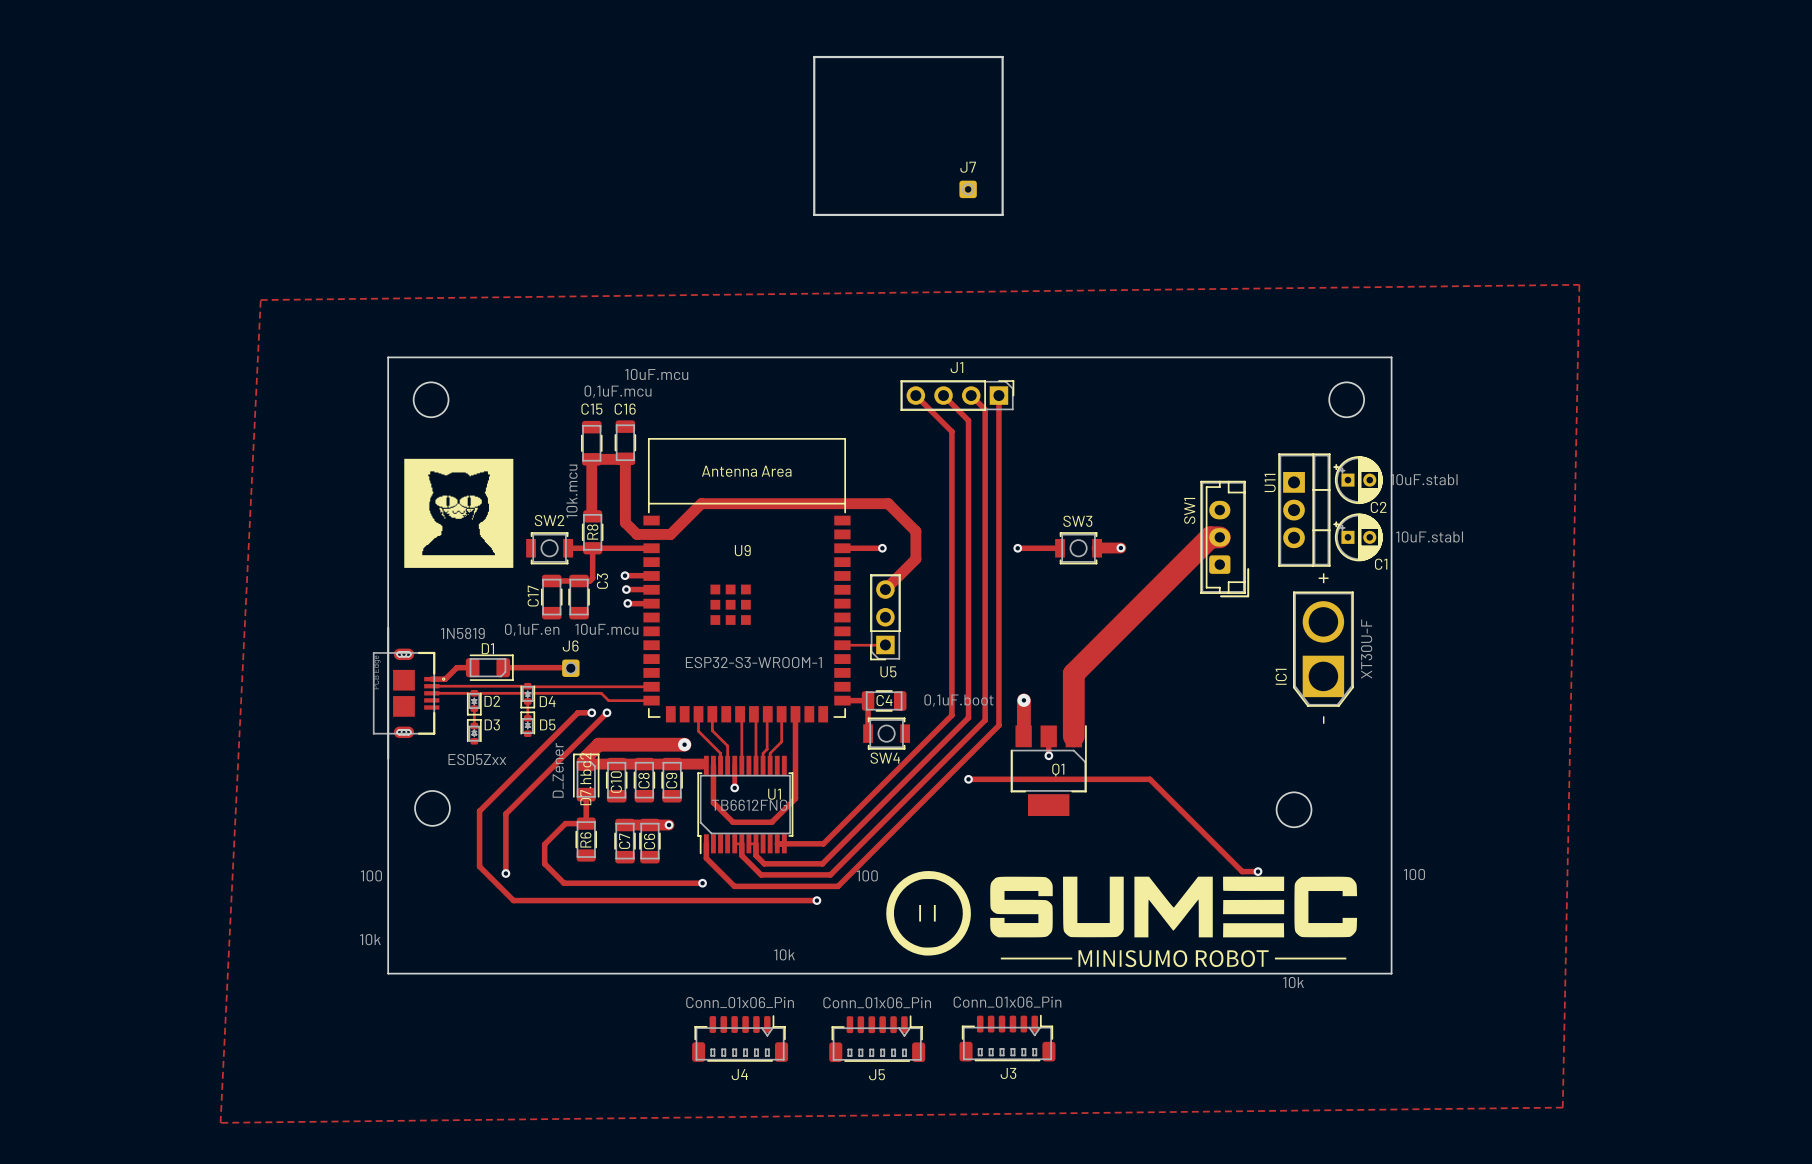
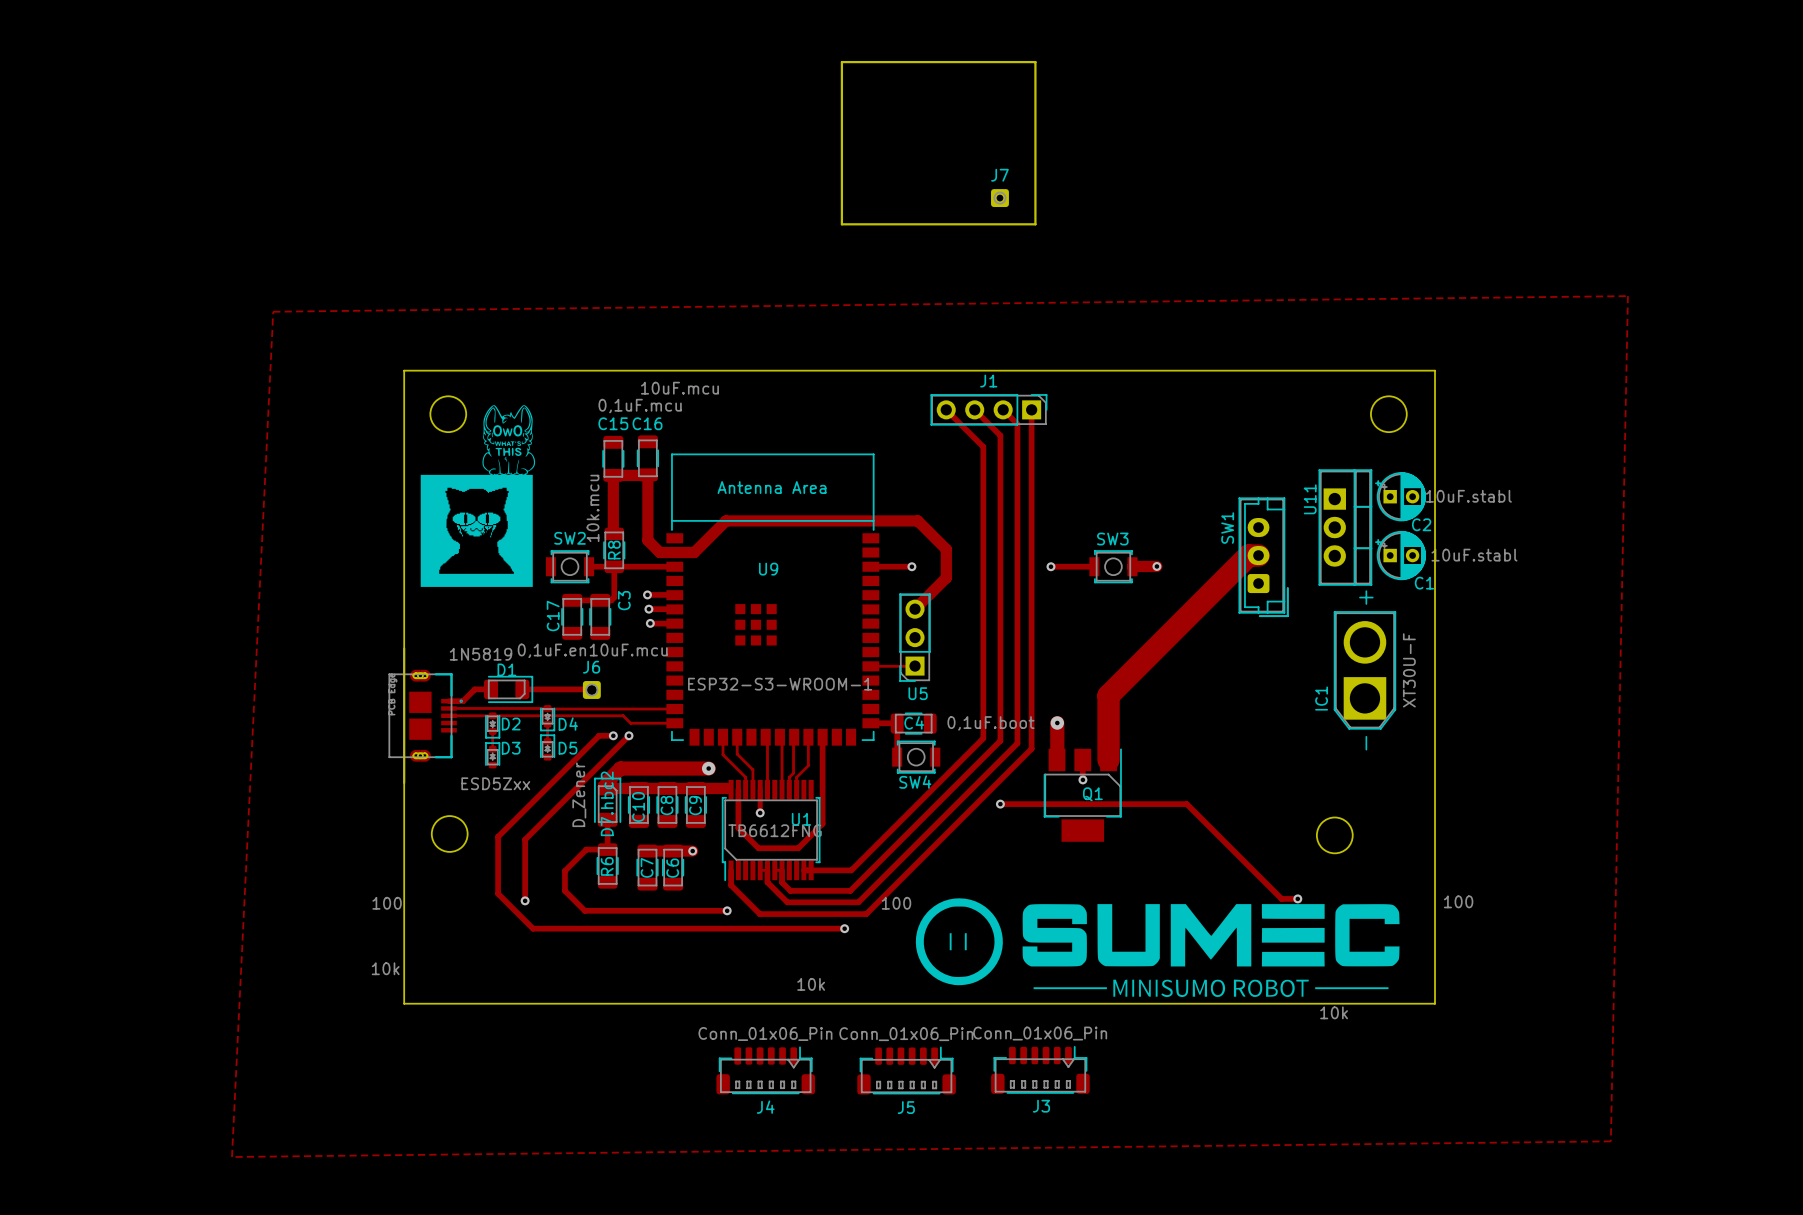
drawing: none -> [482, 405, 536, 476]

